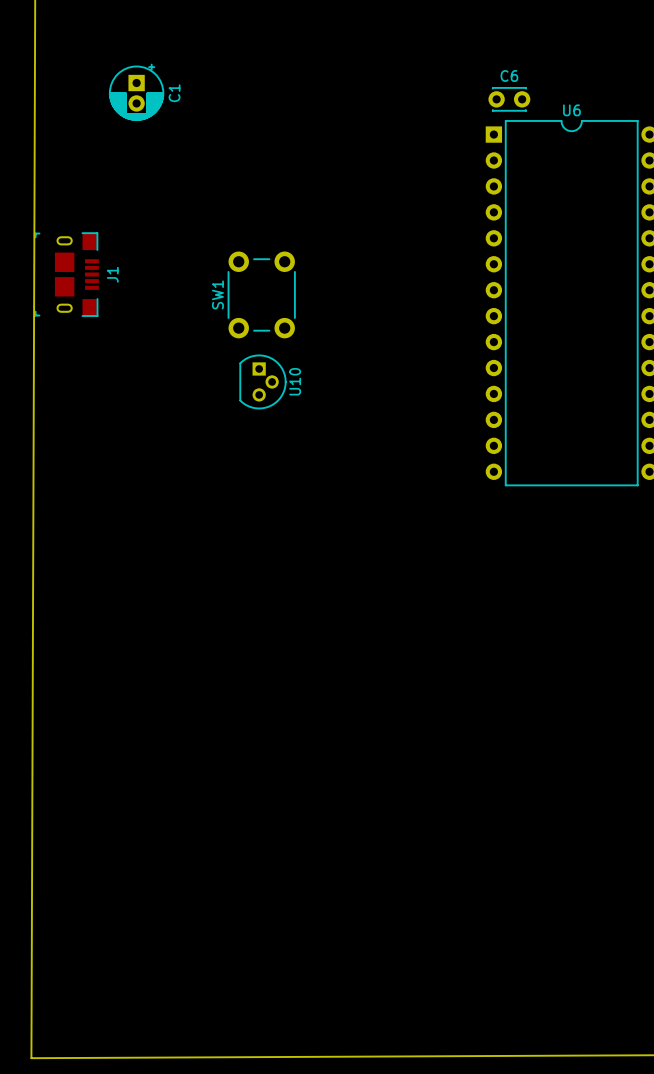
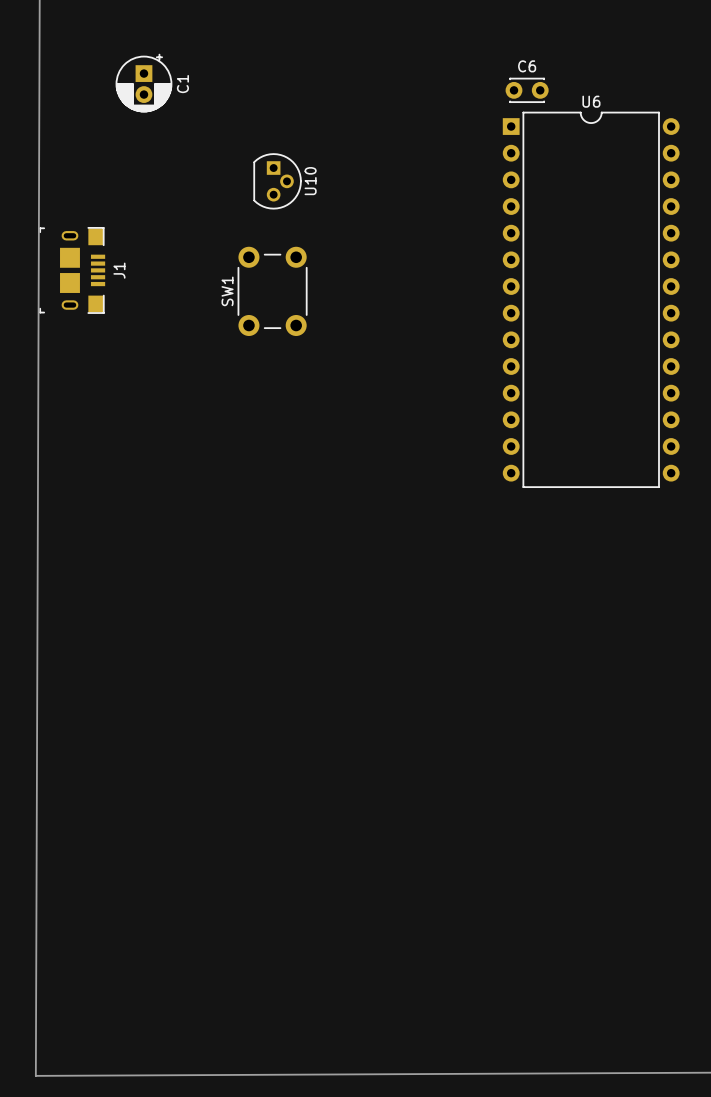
U10 position: (262, 381) -> (277, 181)

